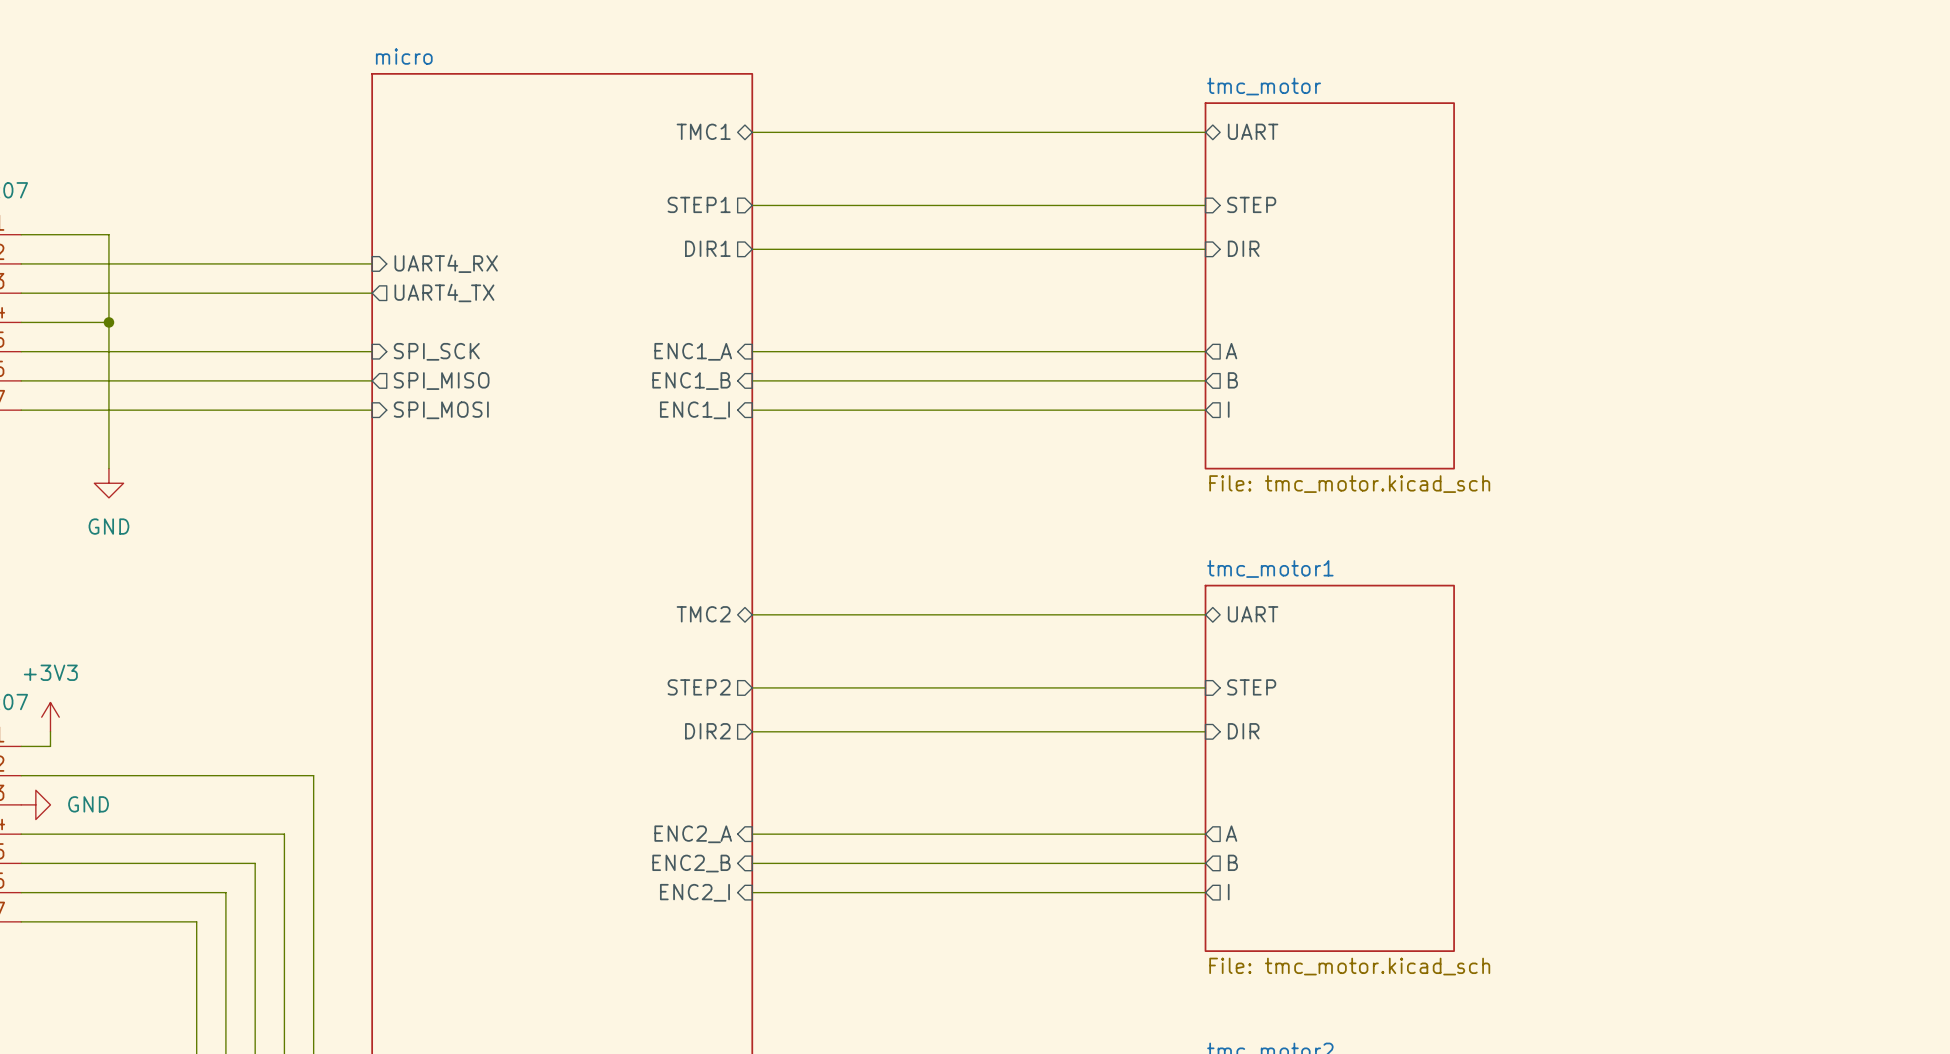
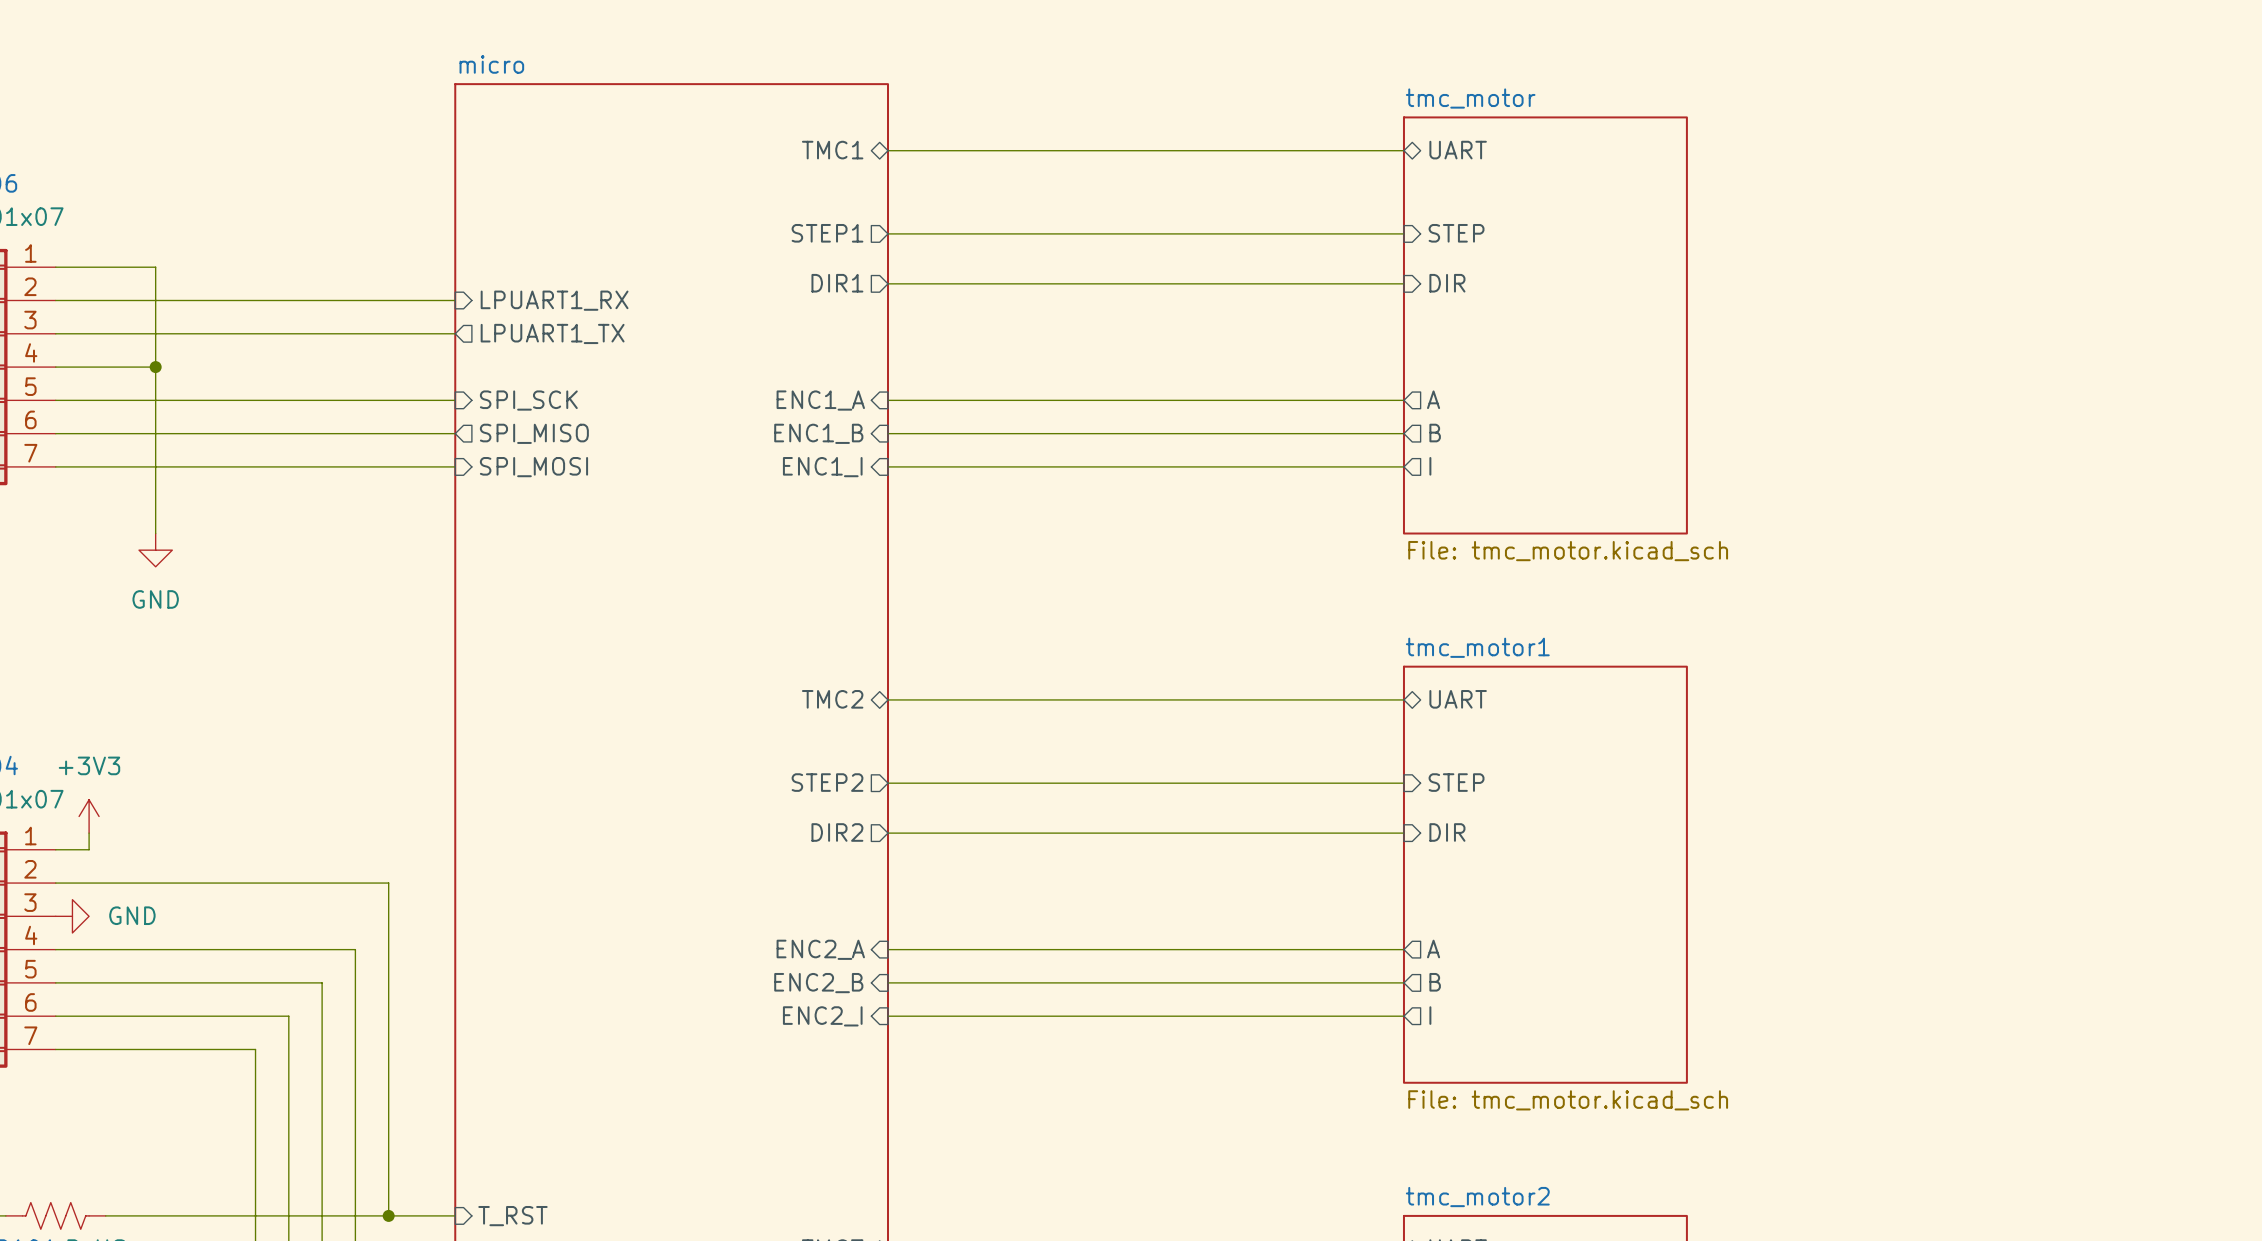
sheet pin: UART4_RX (446, 263) -> LPUART1_RX (554, 300)
sheet pin: UART4_TX (444, 292) -> LPUART1_TX (552, 333)

